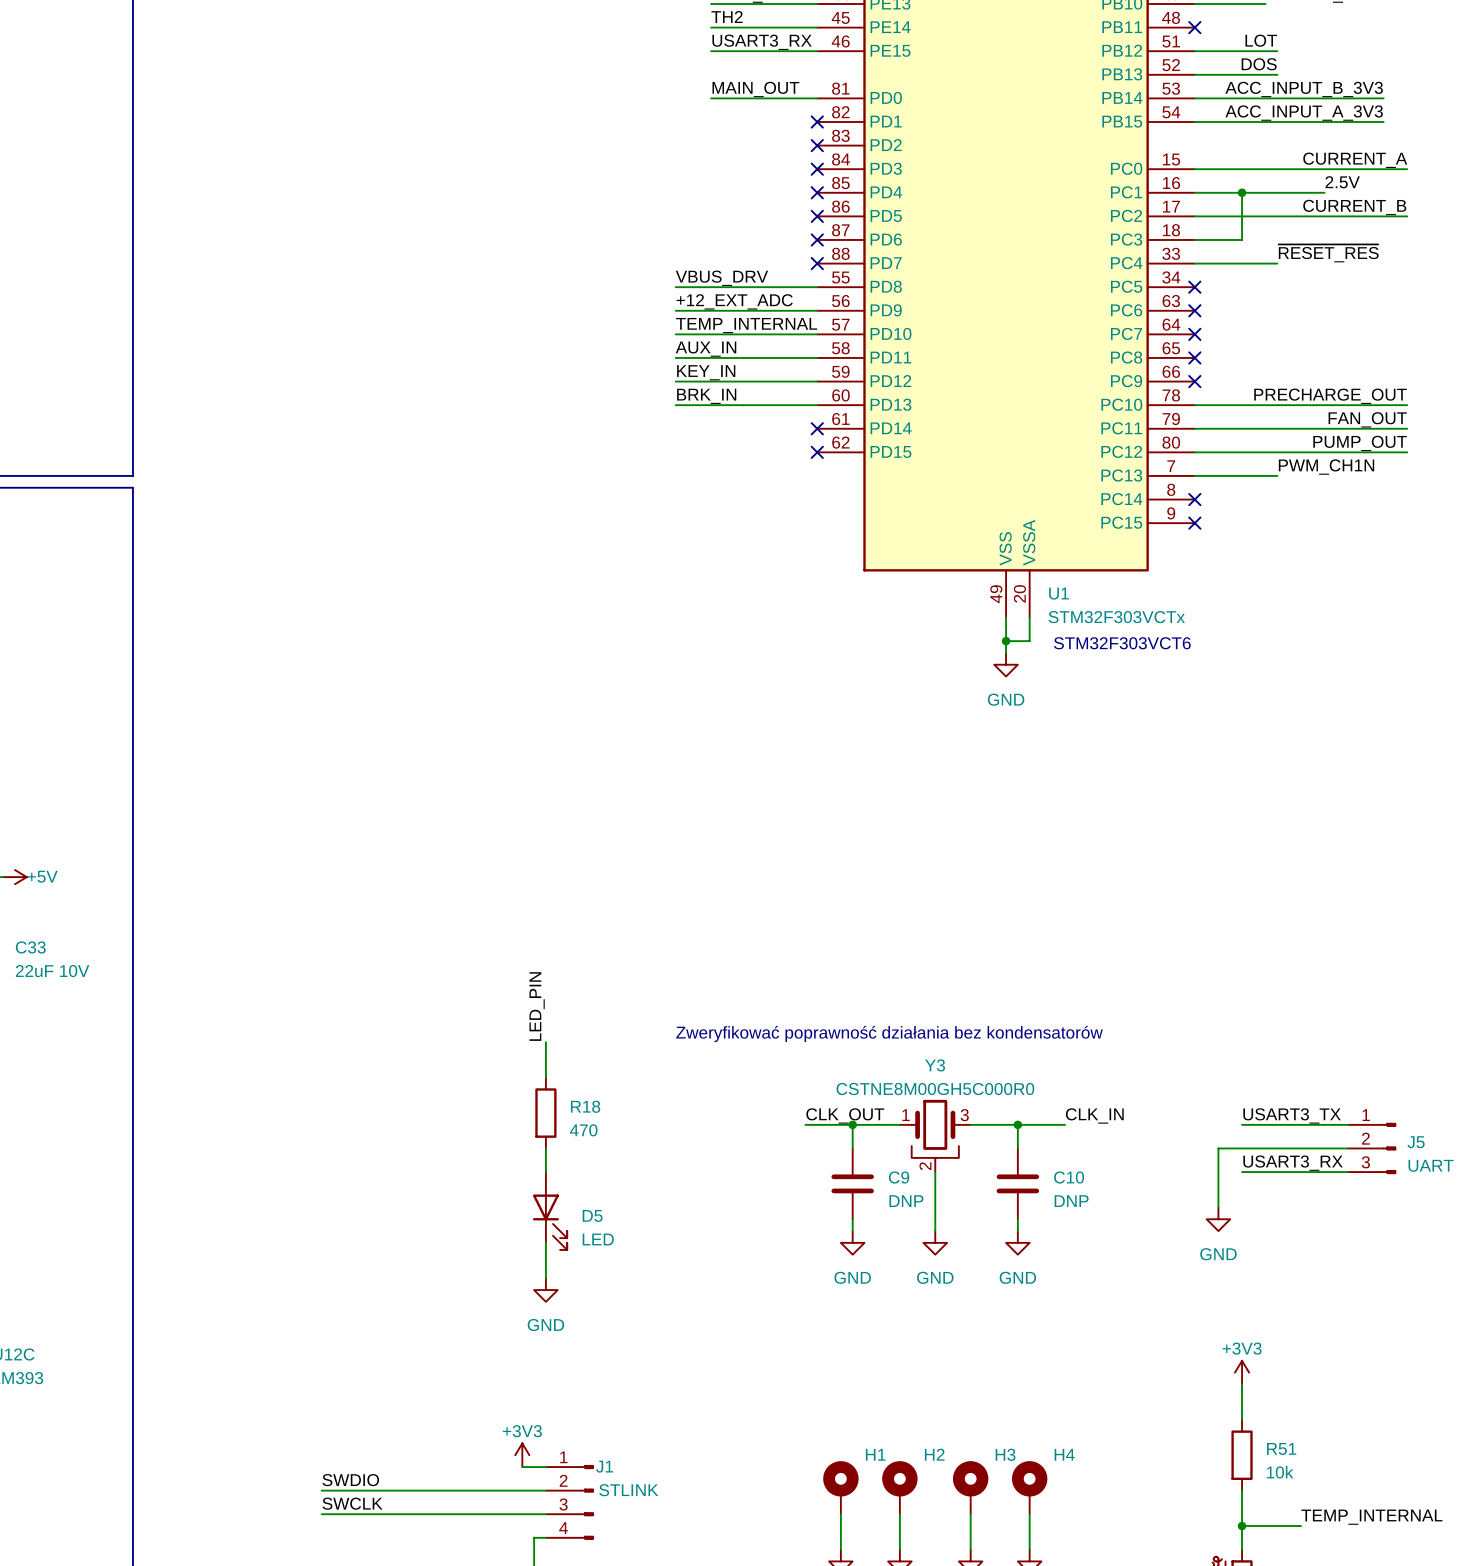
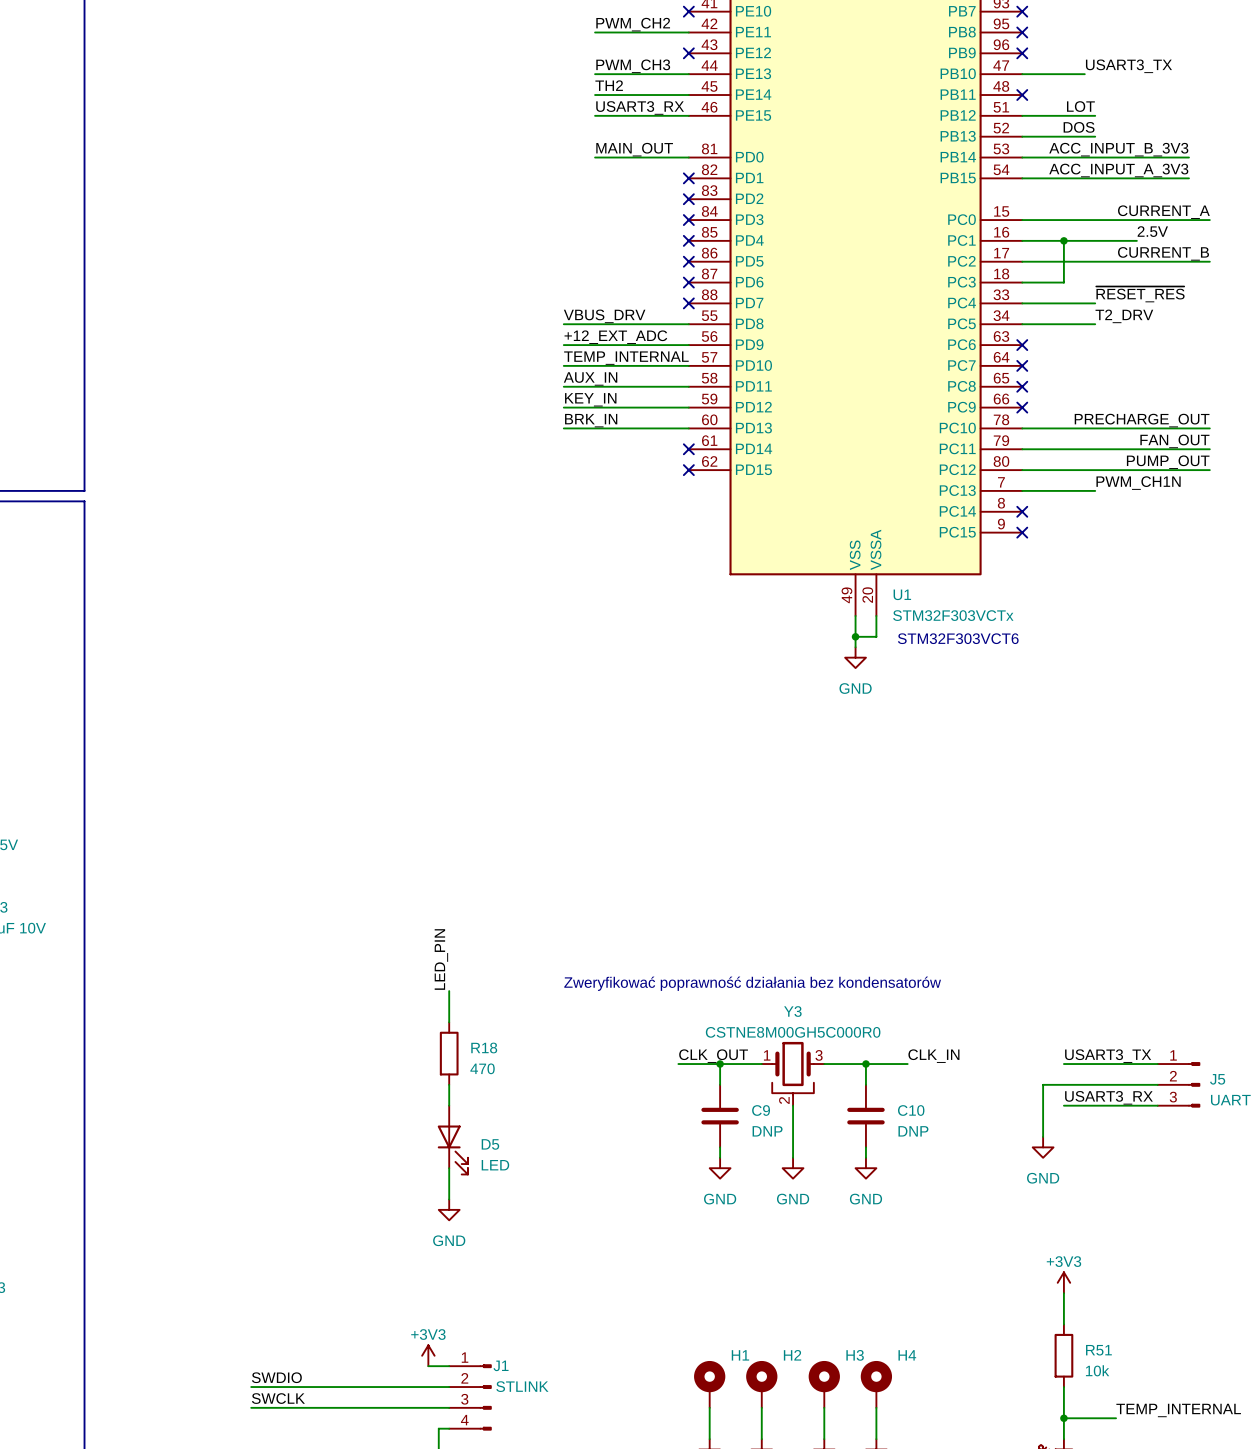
label: none -> T2_DRV (1124, 316)
wire: none -> (1022, 324) (1095, 324)
no-connect mark: (1194, 287) -> none

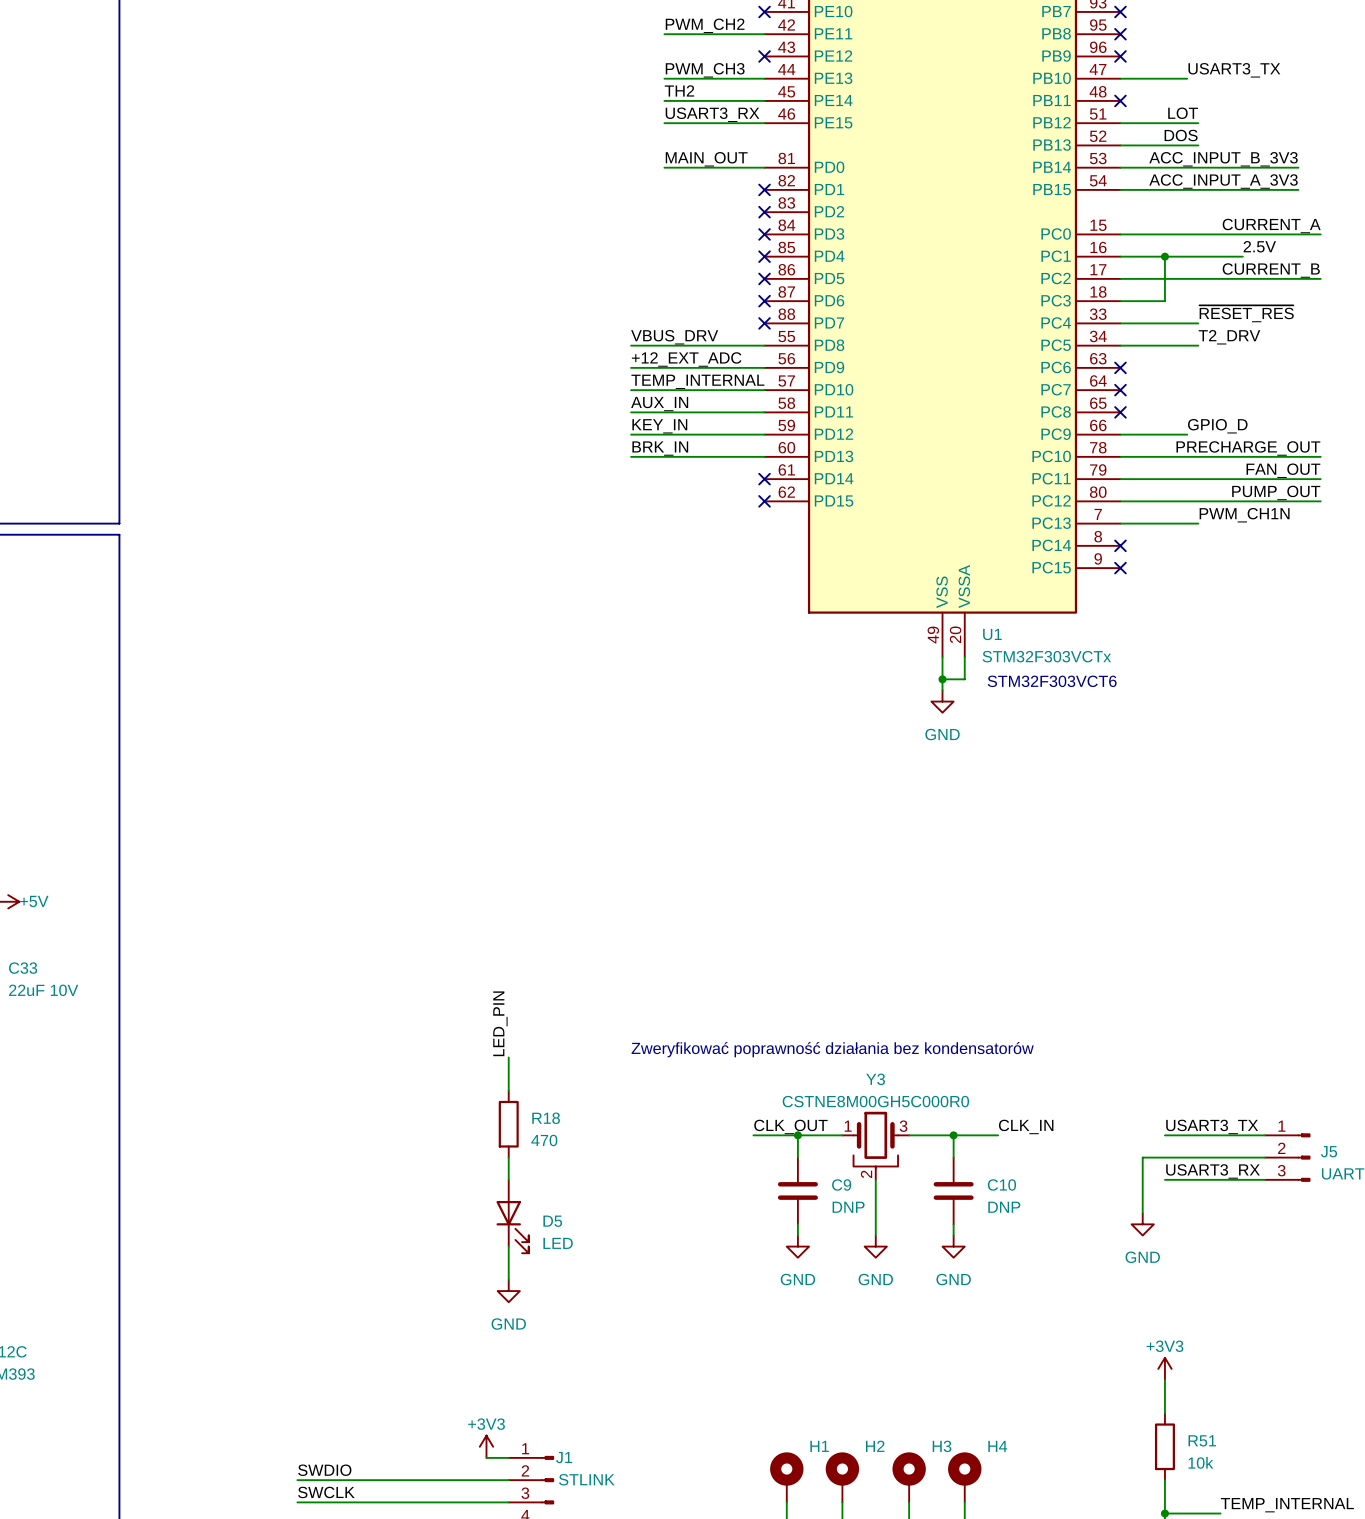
label: none -> GPIO_D (1217, 426)
wire: none -> (1120, 434) (1187, 434)
no-connect mark: (1022, 407) -> none

